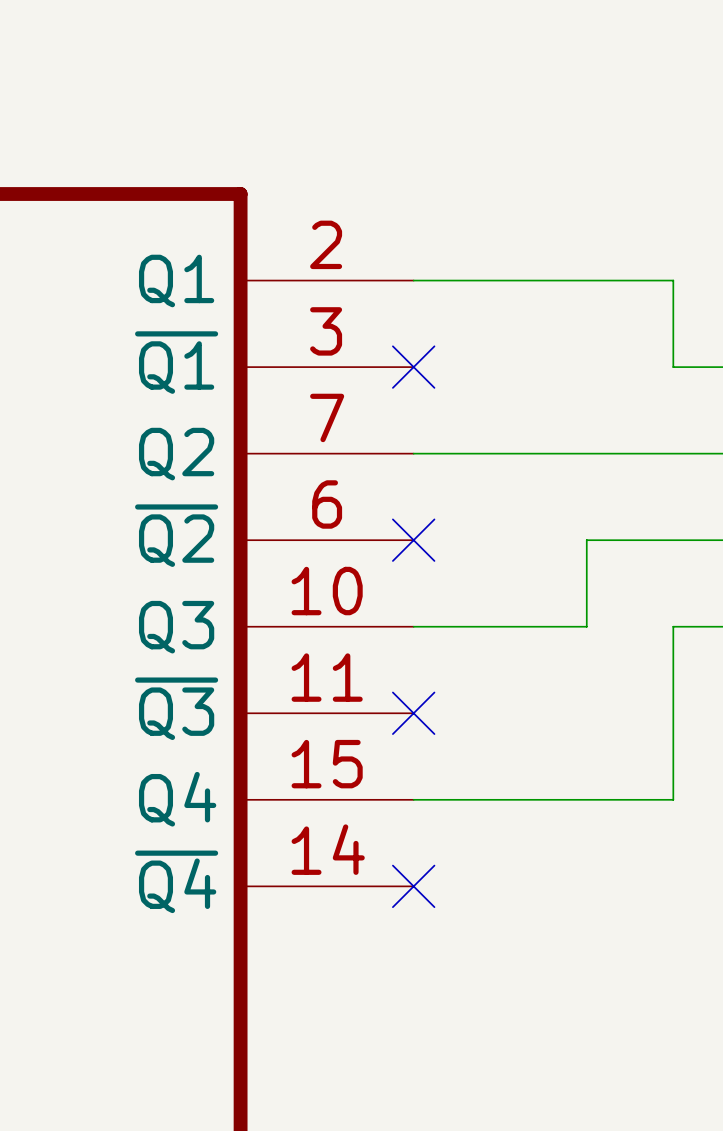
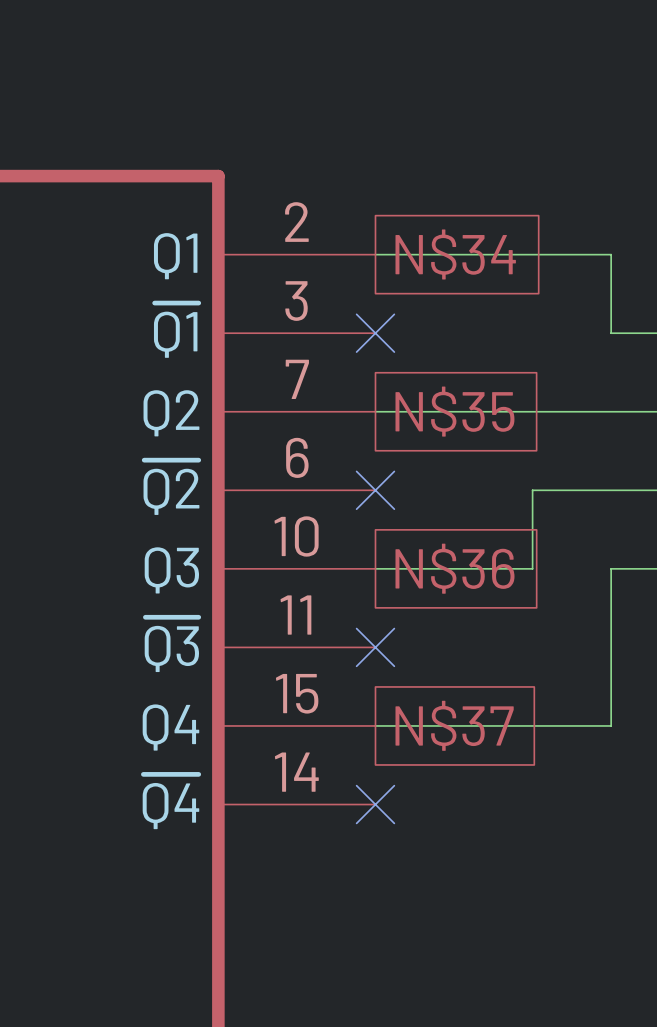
global label: none -> N$34 (455, 254)
global label: none -> N$35 (454, 411)
global label: none -> N$36 (454, 568)
global label: none -> N$37 (454, 725)

